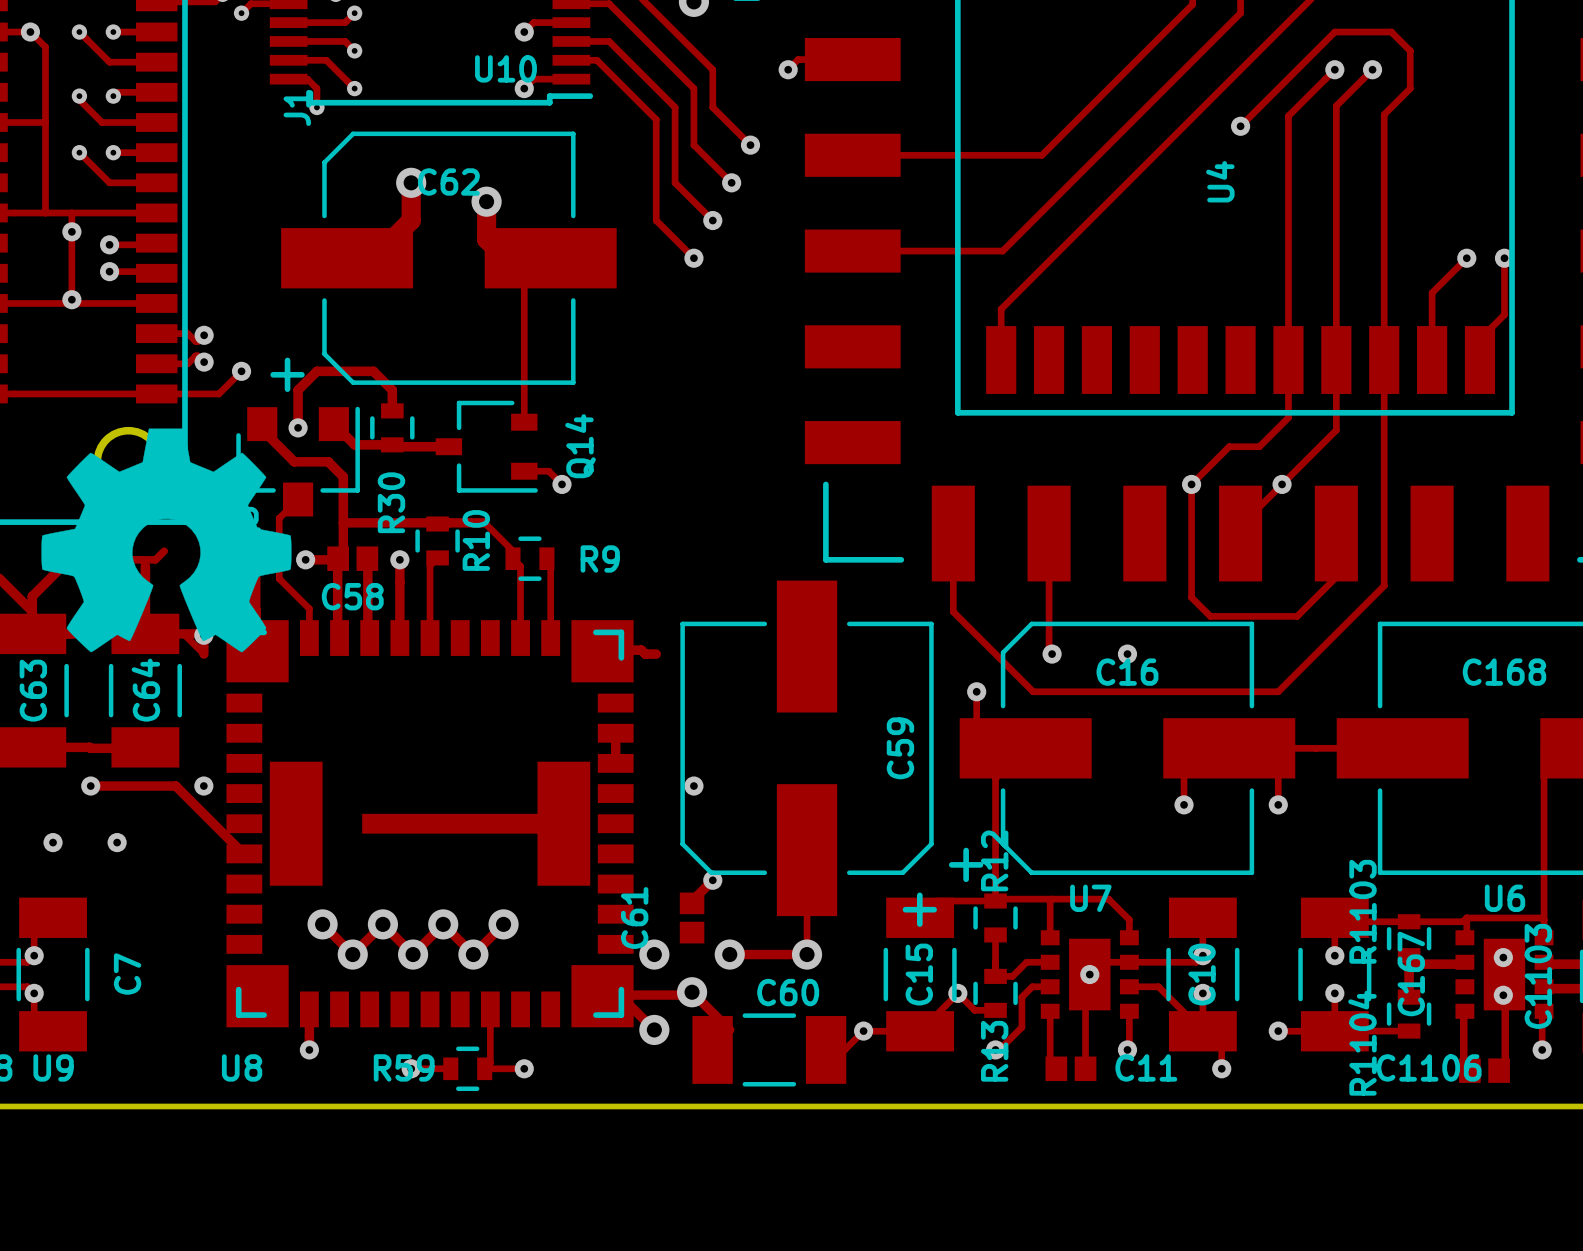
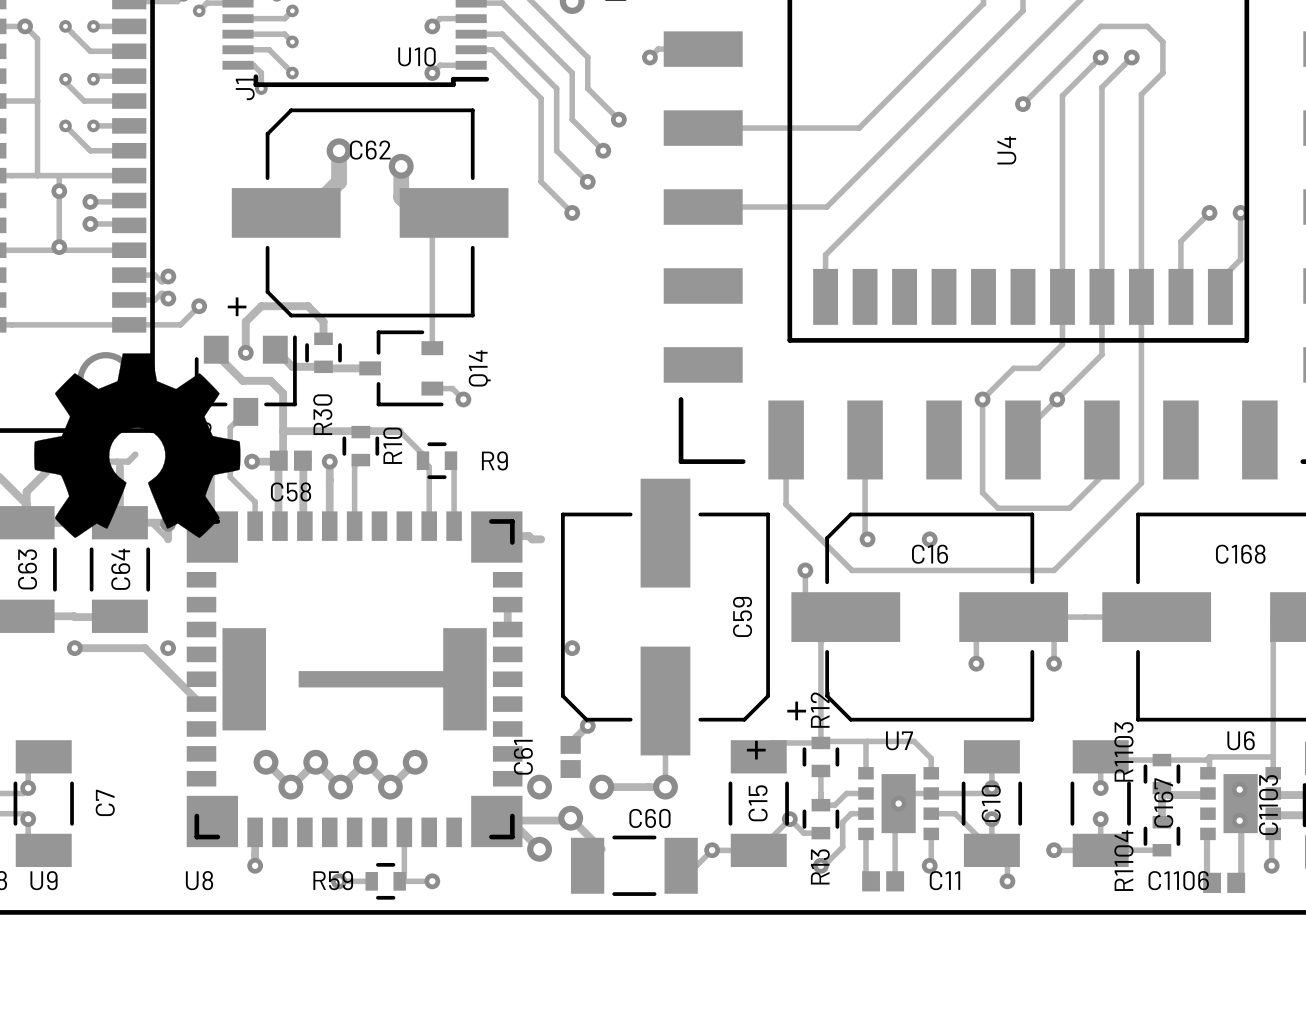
via: (53, 842) -> none
via: (117, 842) -> none

